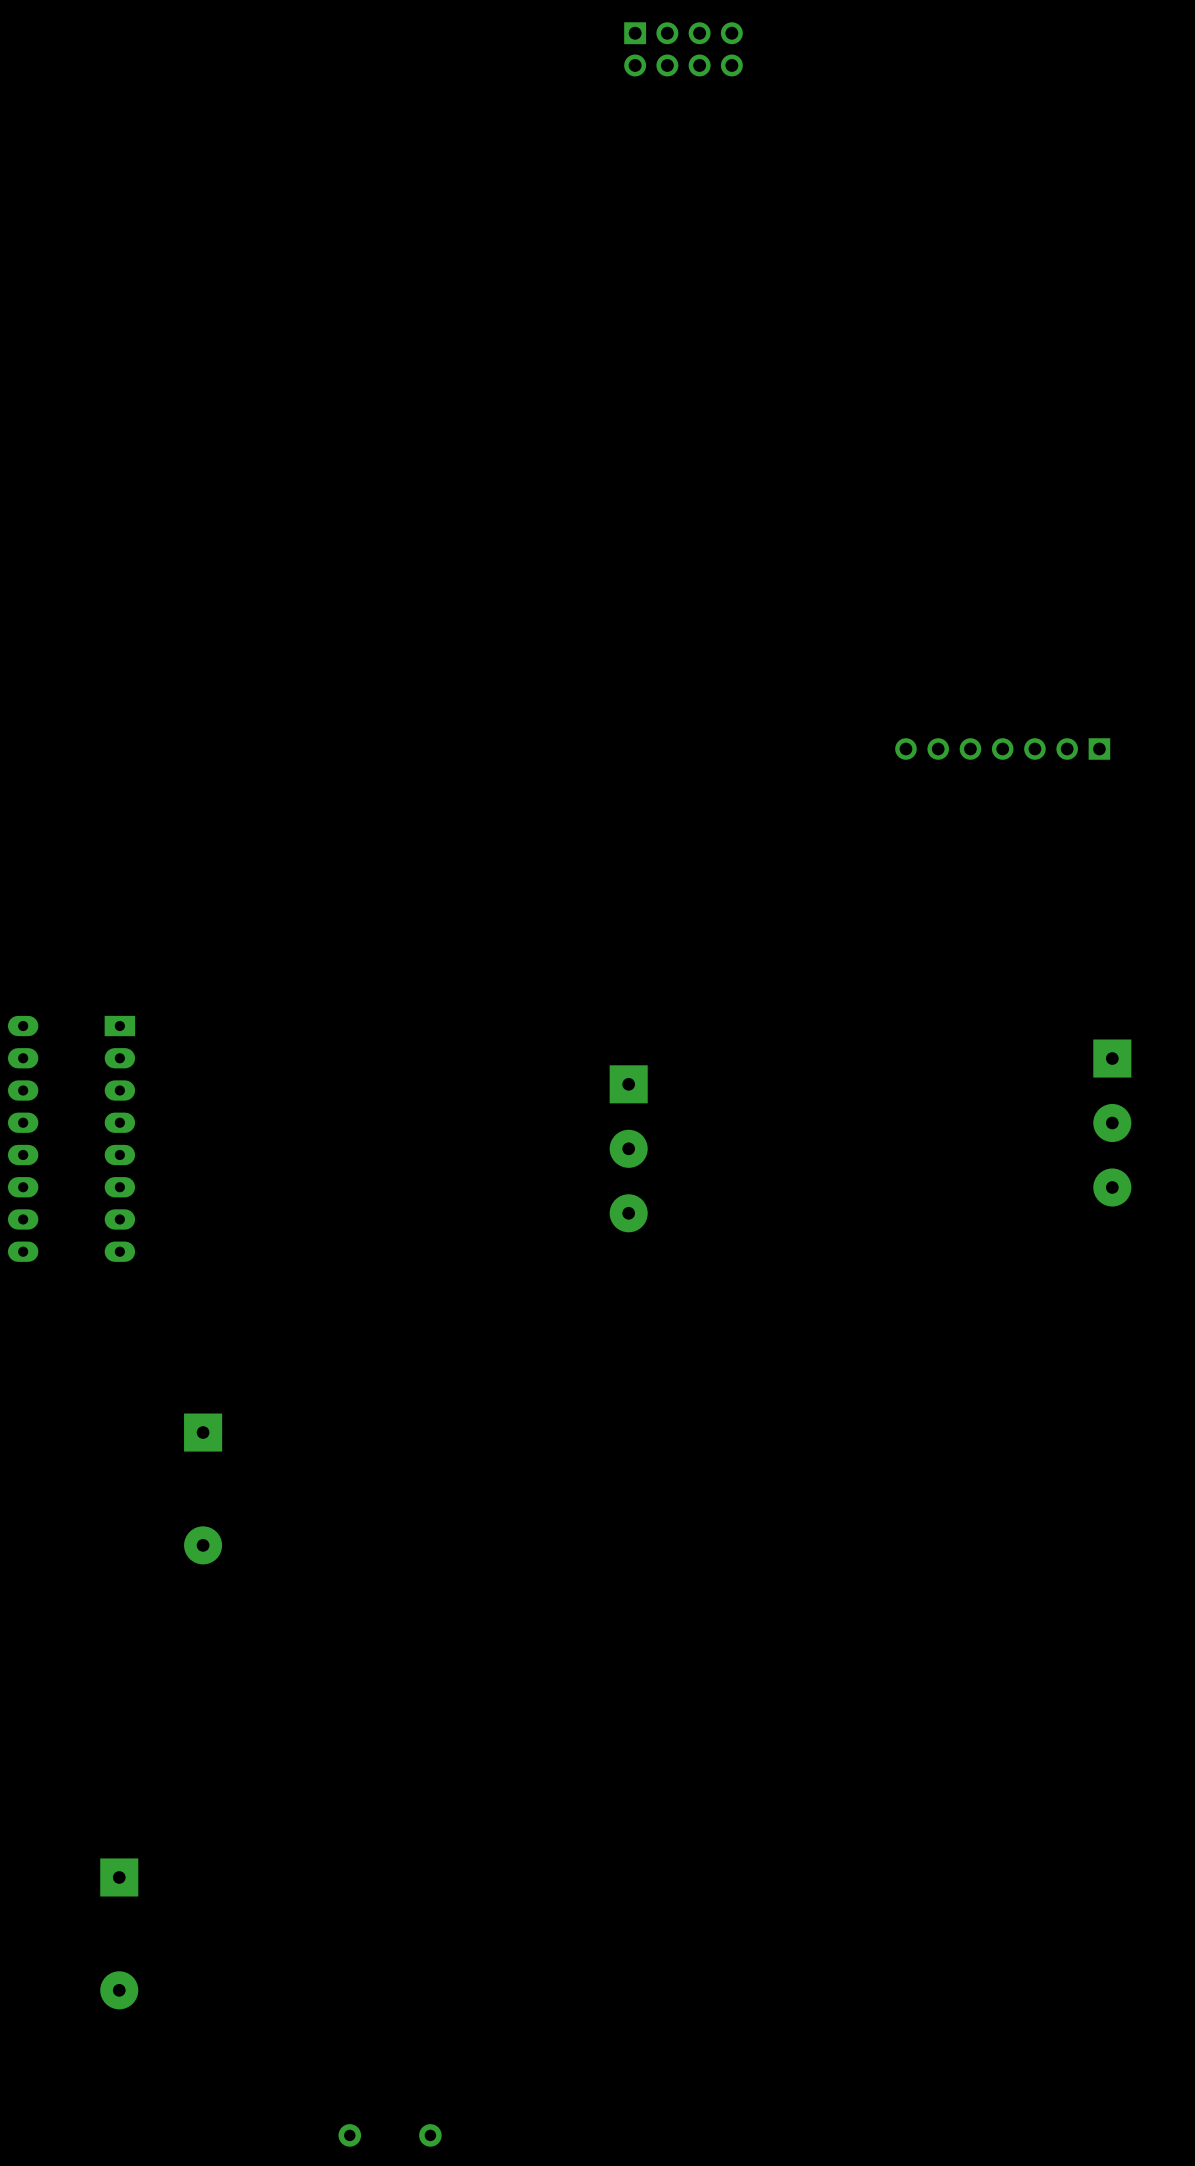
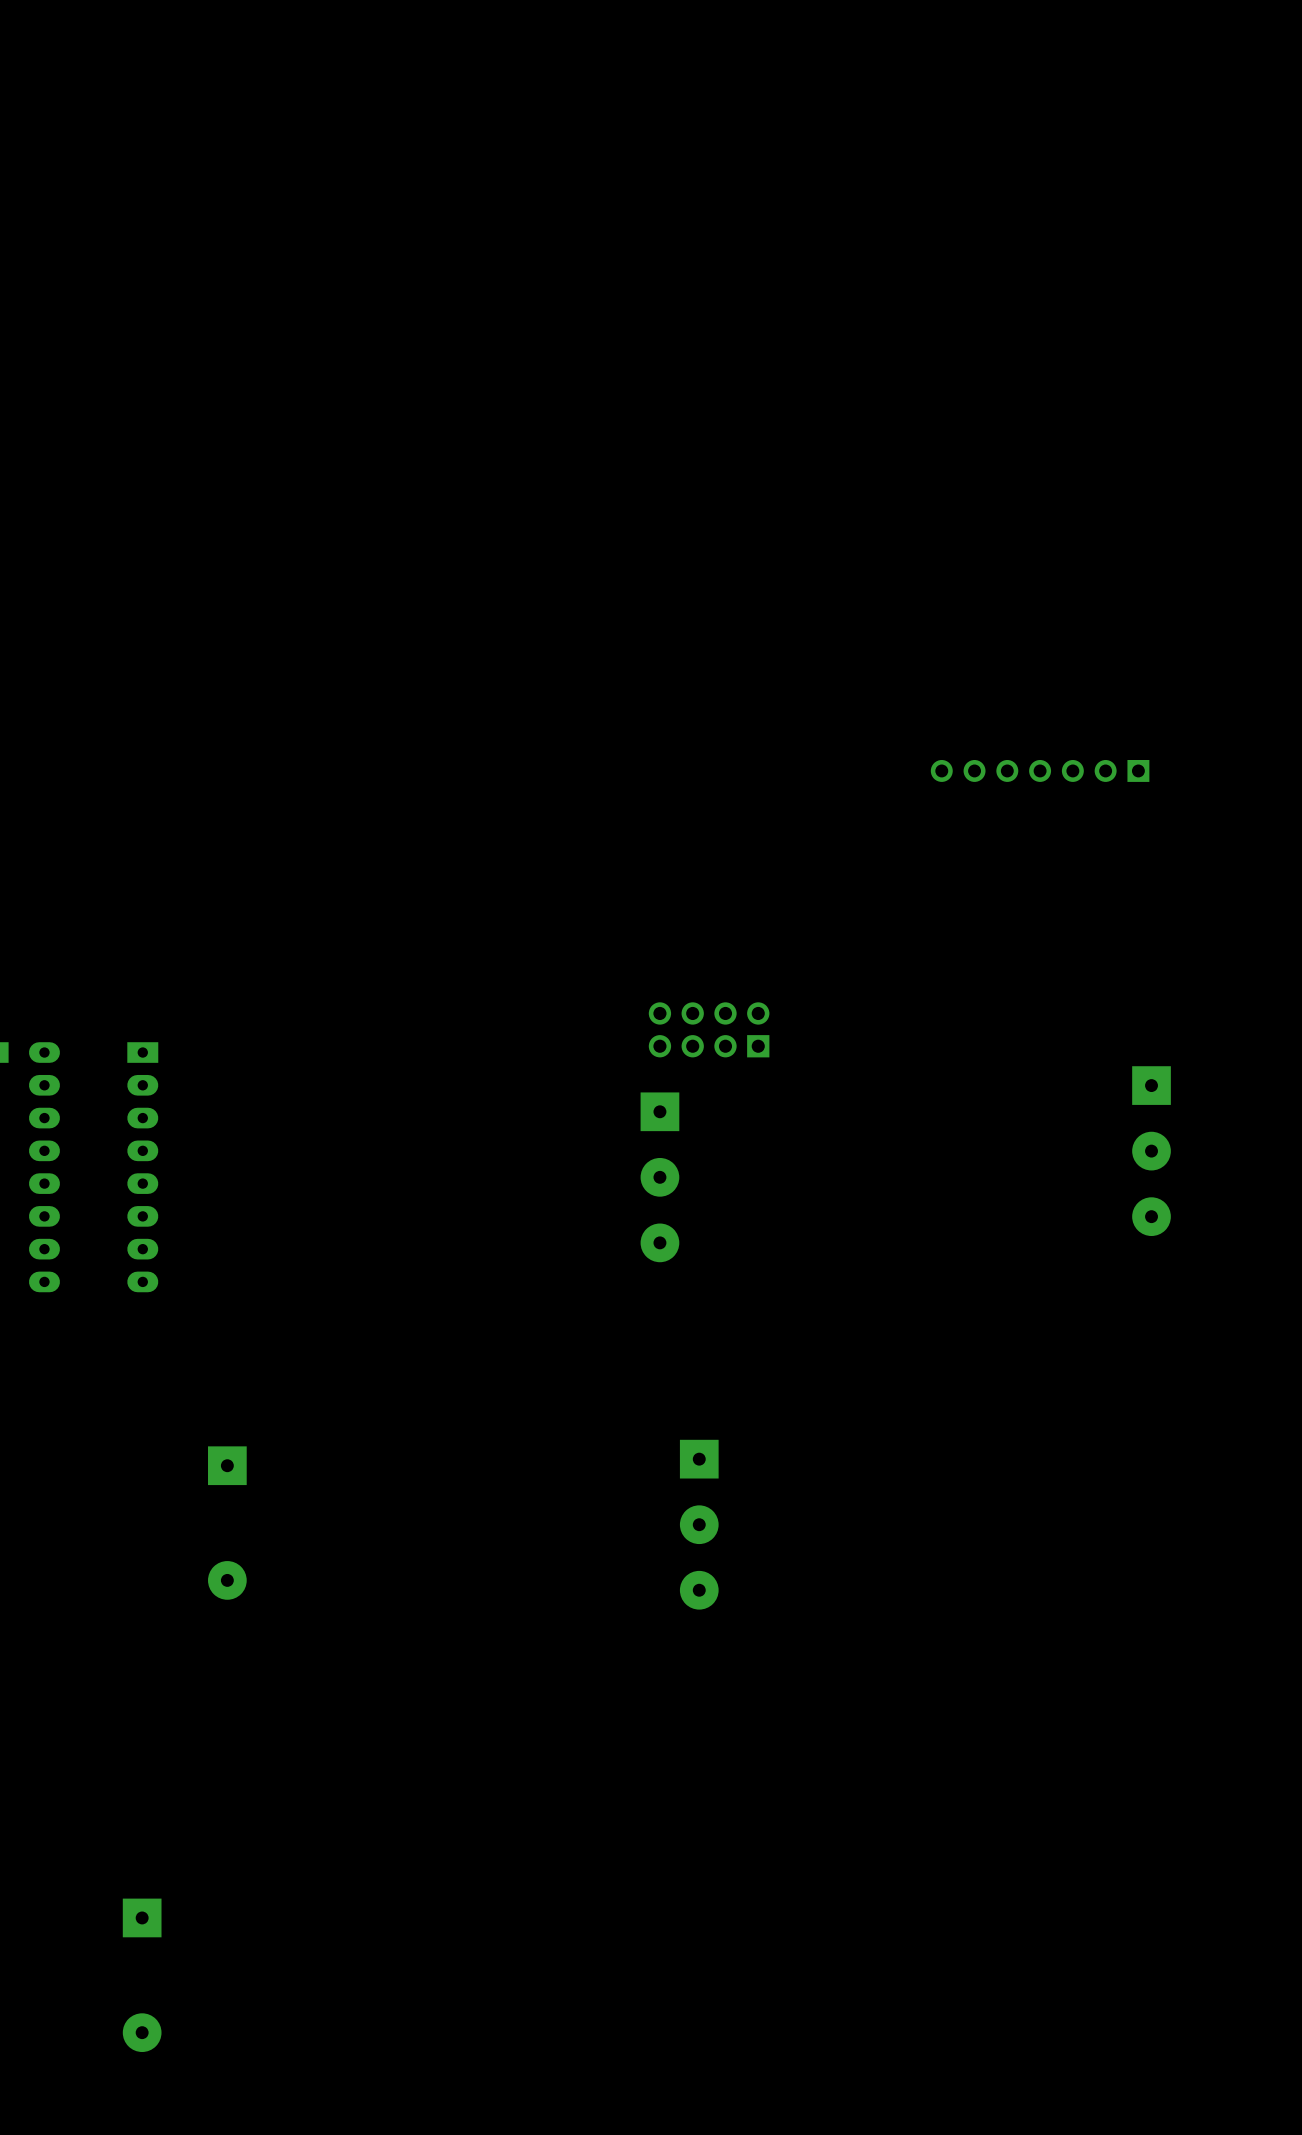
part: (683, 49) -> none
part: none -> (709, 1029)
part: none -> (699, 1524)

